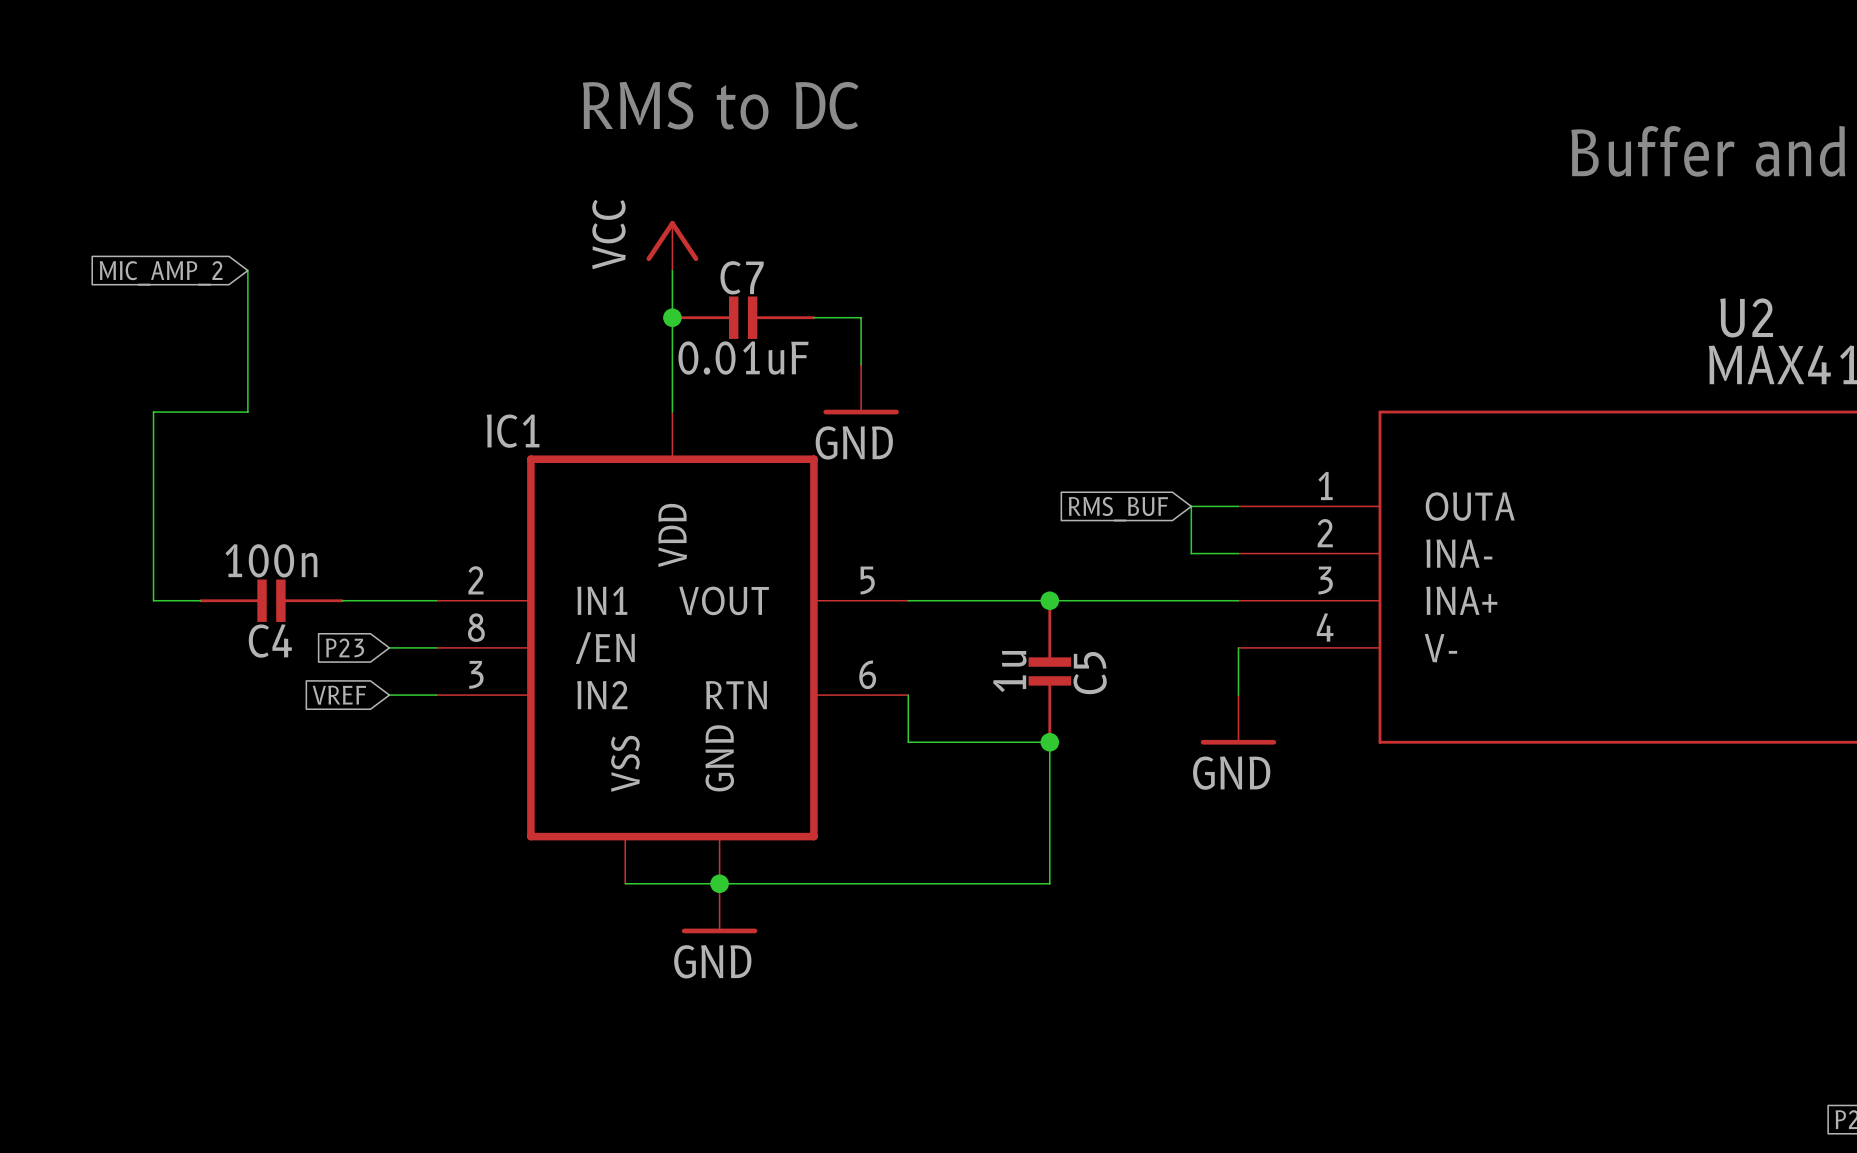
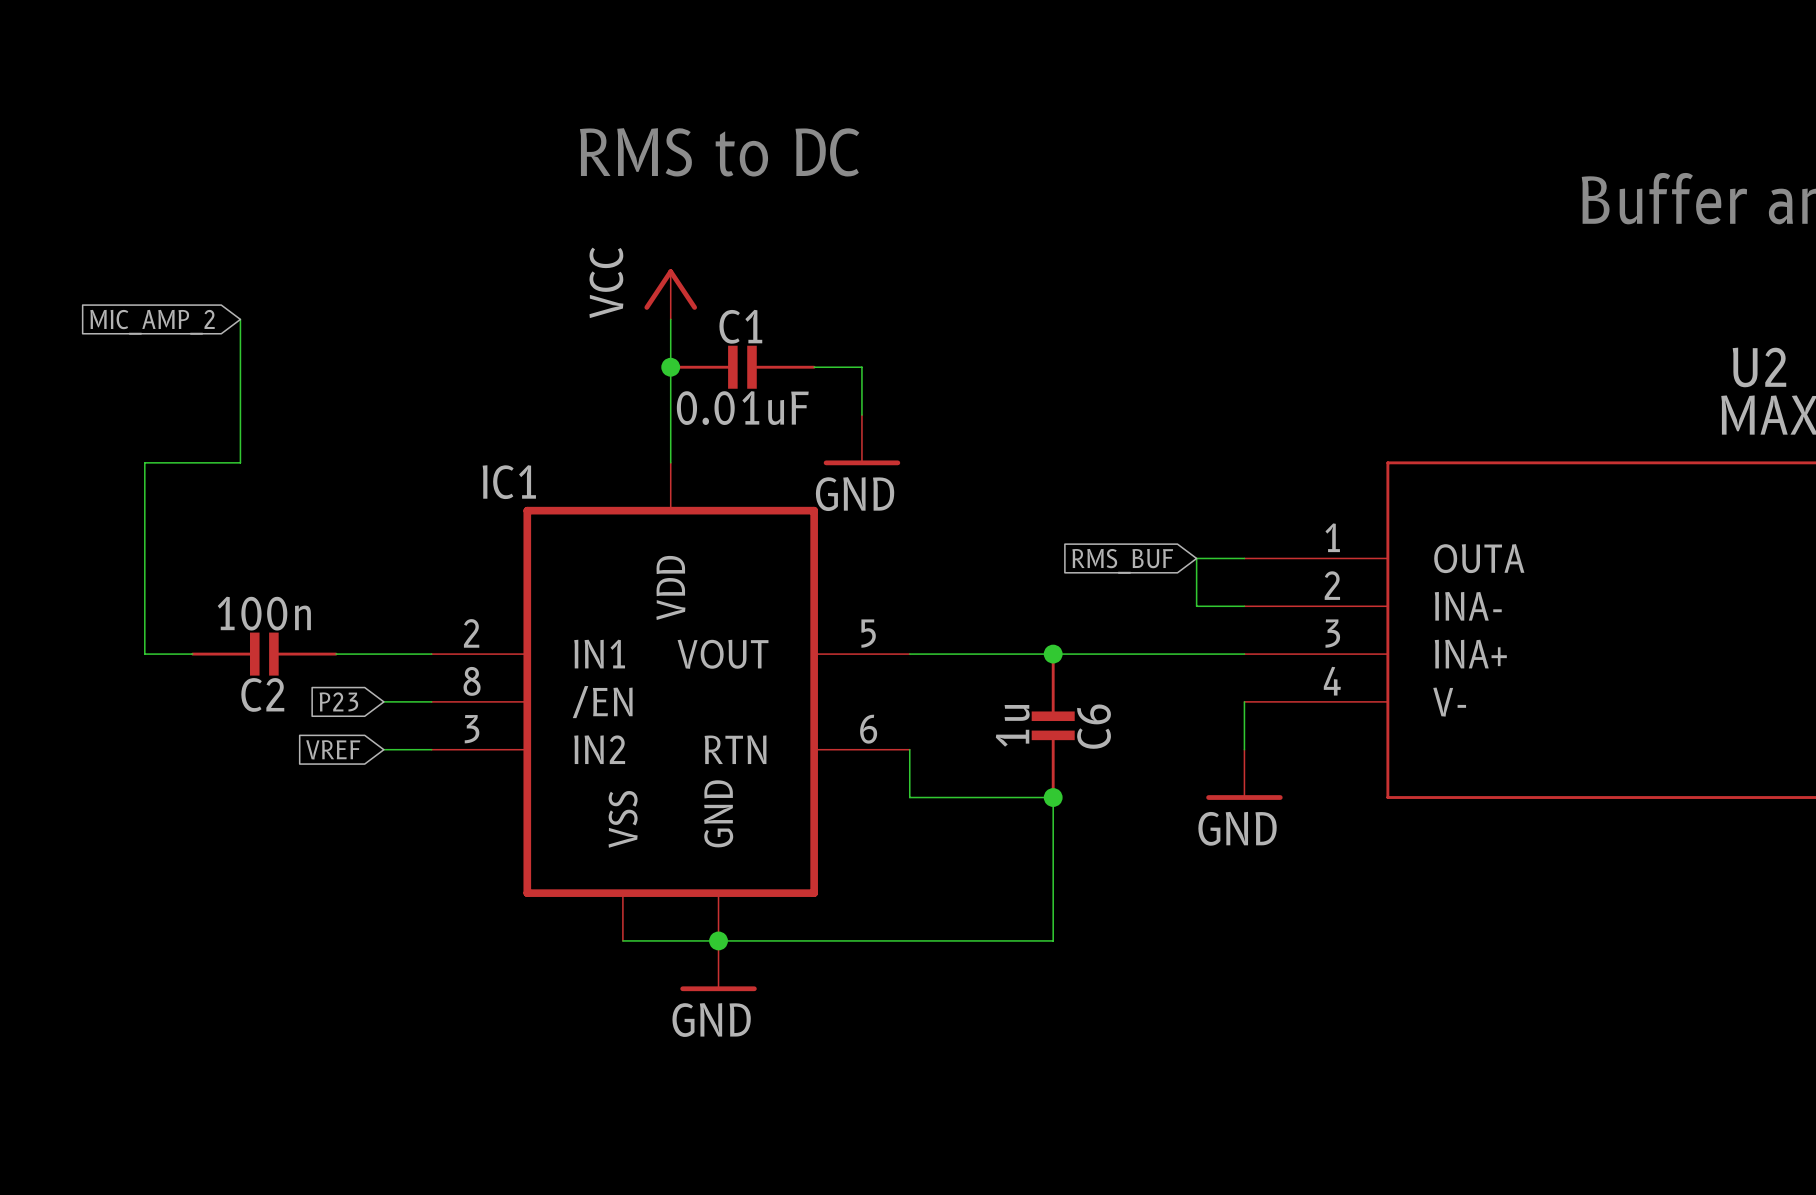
C7 name: C7 (742, 277) -> C1 (740, 326)
C4 name: C4 (270, 641) -> C2 (262, 694)
C5 name: C5 (1090, 673) -> C6 (1094, 726)

